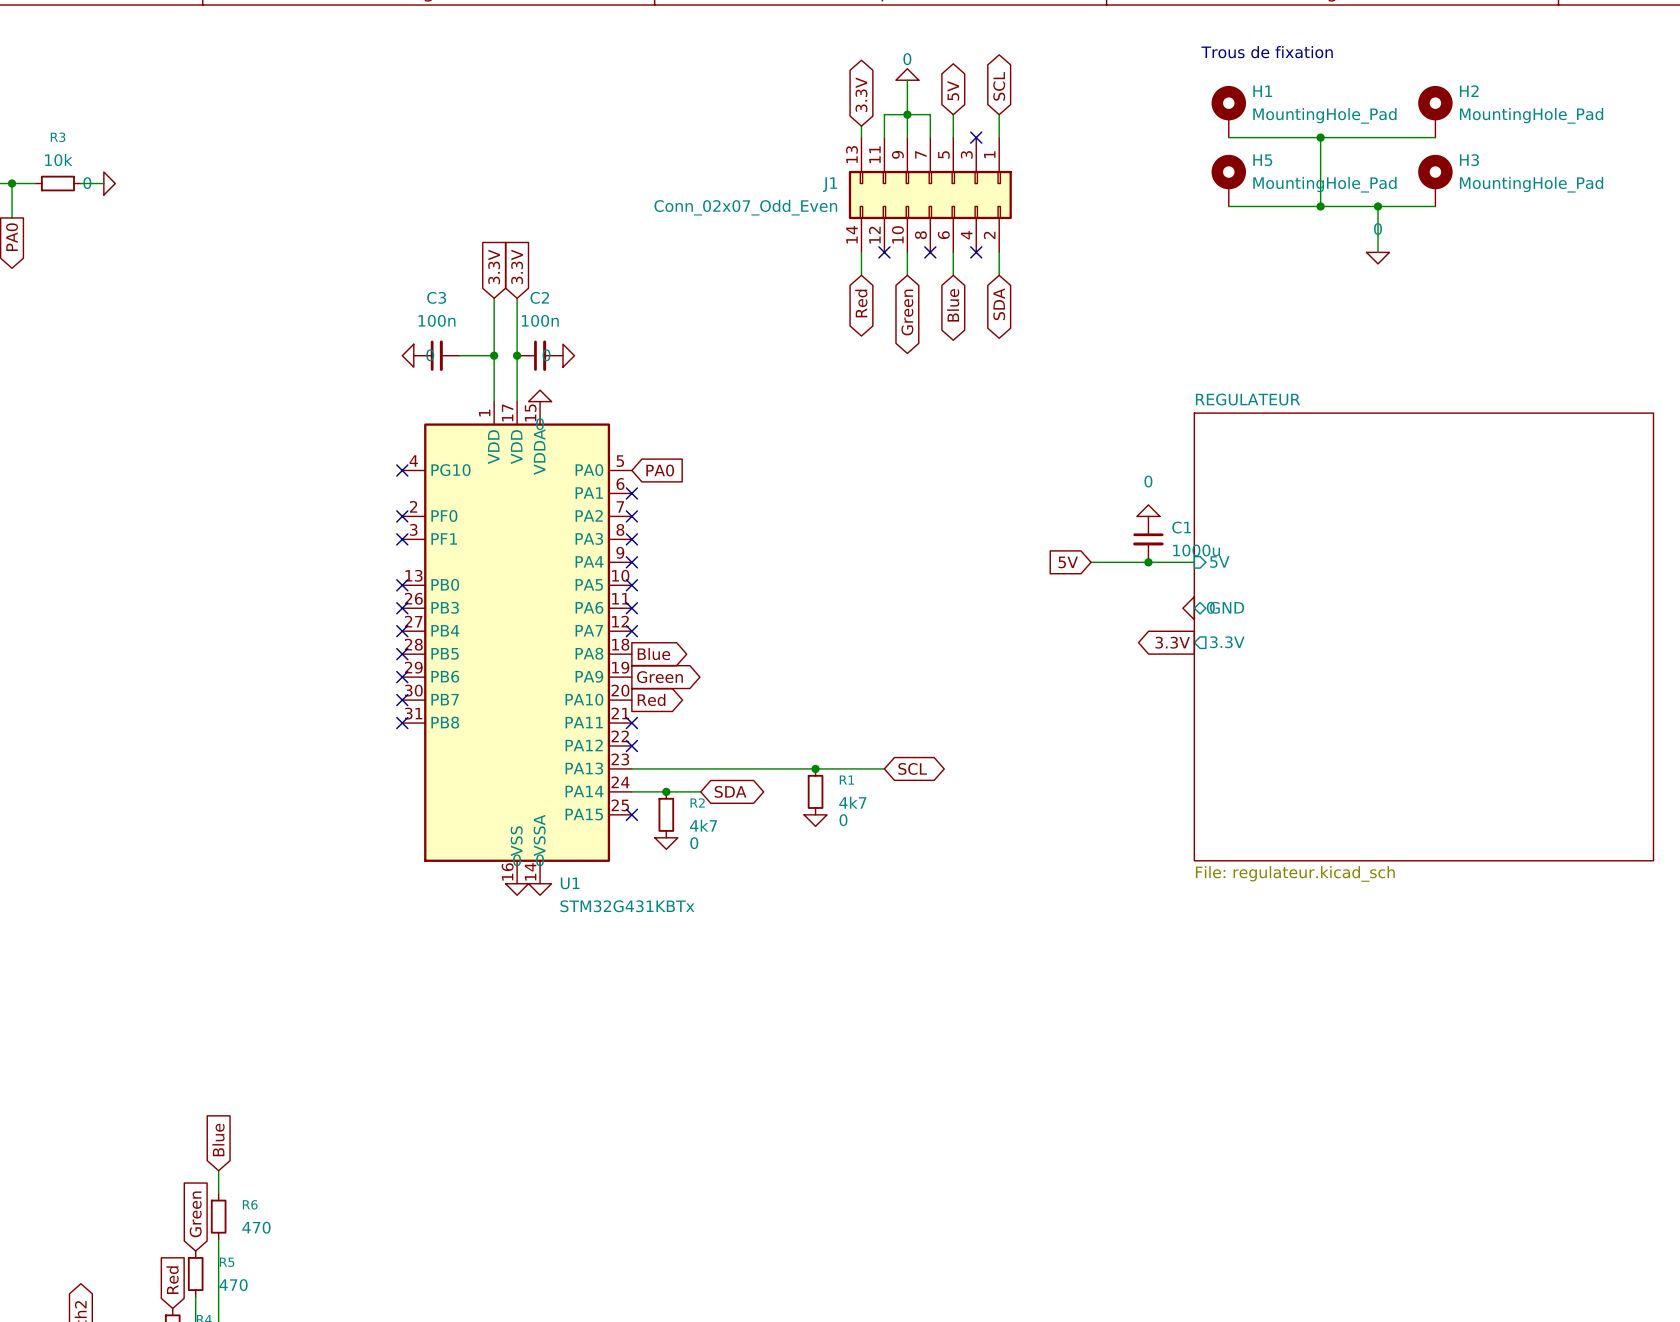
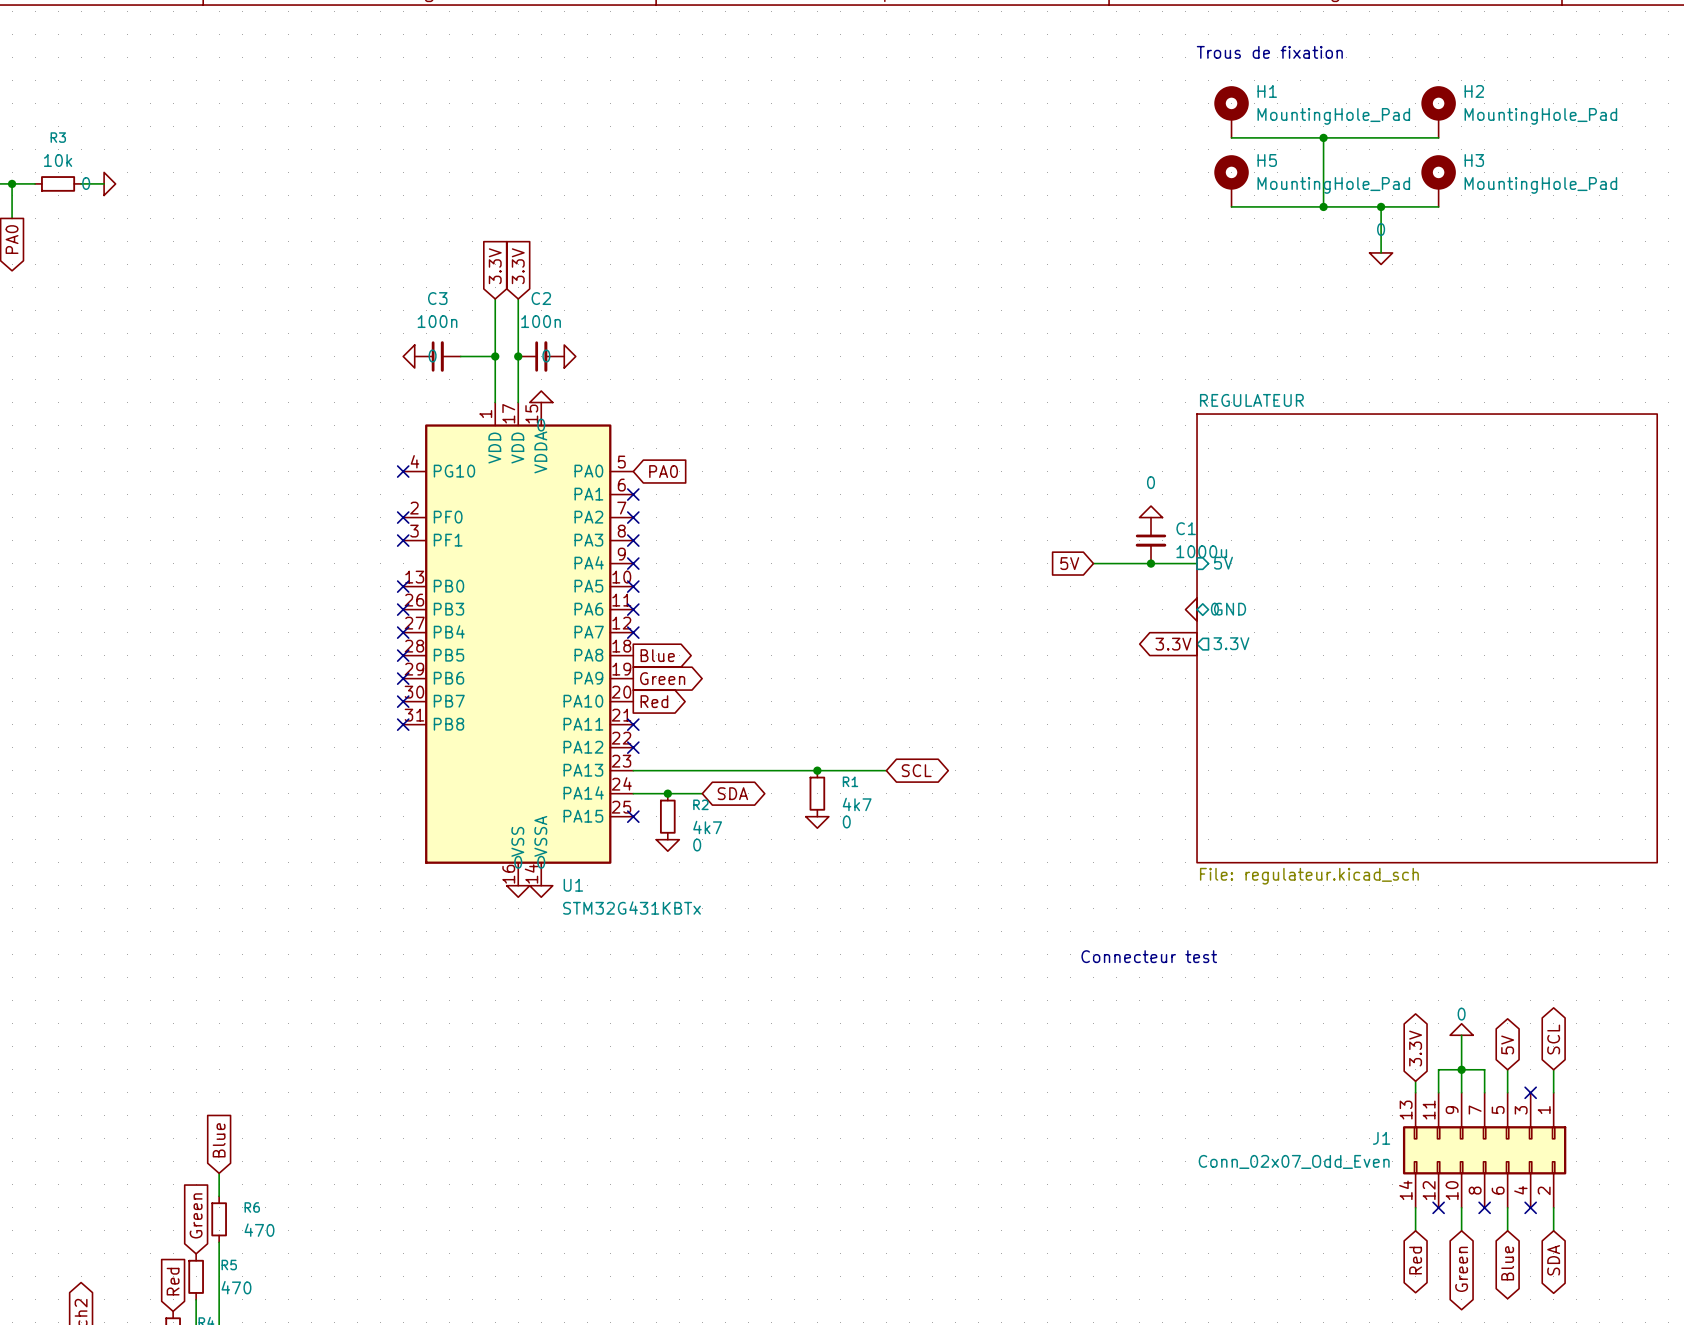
power symbol: 0 (907, 74) -> none
wire: (907, 80) (907, 137) -> none
global label: SCL (999, 86) -> none
global label: 5V (953, 90) -> none
global label: 3.3V (861, 94) -> none
junction: (907, 114) -> none
wire: (953, 114) (953, 137) -> none
wire: (999, 114) (999, 137) -> none
wire: (861, 126) (861, 137) -> none
wire: (884, 137) (884, 114) (930, 114) (930, 137) -> none
no-connect mark: (976, 137) -> none
J1 position: (930, 195) -> (1484, 1150)
wire: (861, 252) (861, 275) -> none
no-connect mark: (884, 252) -> none
wire: (907, 252) (907, 275) -> none
no-connect mark: (930, 252) -> none
wire: (953, 252) (953, 275) -> none
no-connect mark: (976, 252) -> none
wire: (999, 252) (999, 275) -> none
global label: Red (861, 303) -> none
global label: SDA (999, 304) -> none
global label: Blue (953, 305) -> none
global label: Green (907, 312) -> none
text: none -> Connecteur test (1149, 956)
power symbol: none -> 0 (1461, 1029)
wire: none -> (1461, 1035) (1461, 1092)
global label: none -> SCL (1553, 1039)
global label: none -> 5V (1507, 1044)
global label: none -> 3.3V (1415, 1048)
junction: none -> (1461, 1069)
wire: none -> (1507, 1069) (1507, 1092)
wire: none -> (1553, 1069) (1553, 1092)
wire: none -> (1415, 1081) (1415, 1092)
wire: none -> (1438, 1092) (1438, 1069) (1484, 1069) (1484, 1092)
no-connect mark: none -> (1530, 1092)
wire: none -> (1415, 1207) (1415, 1230)
no-connect mark: none -> (1438, 1207)
wire: none -> (1461, 1207) (1461, 1230)
no-connect mark: none -> (1484, 1207)
wire: none -> (1507, 1207) (1507, 1230)
no-connect mark: none -> (1530, 1207)
wire: none -> (1553, 1207) (1553, 1230)
global label: none -> Red (1415, 1260)
global label: none -> SDA (1553, 1260)
global label: none -> Blue (1507, 1263)
global label: none -> Green (1461, 1269)

